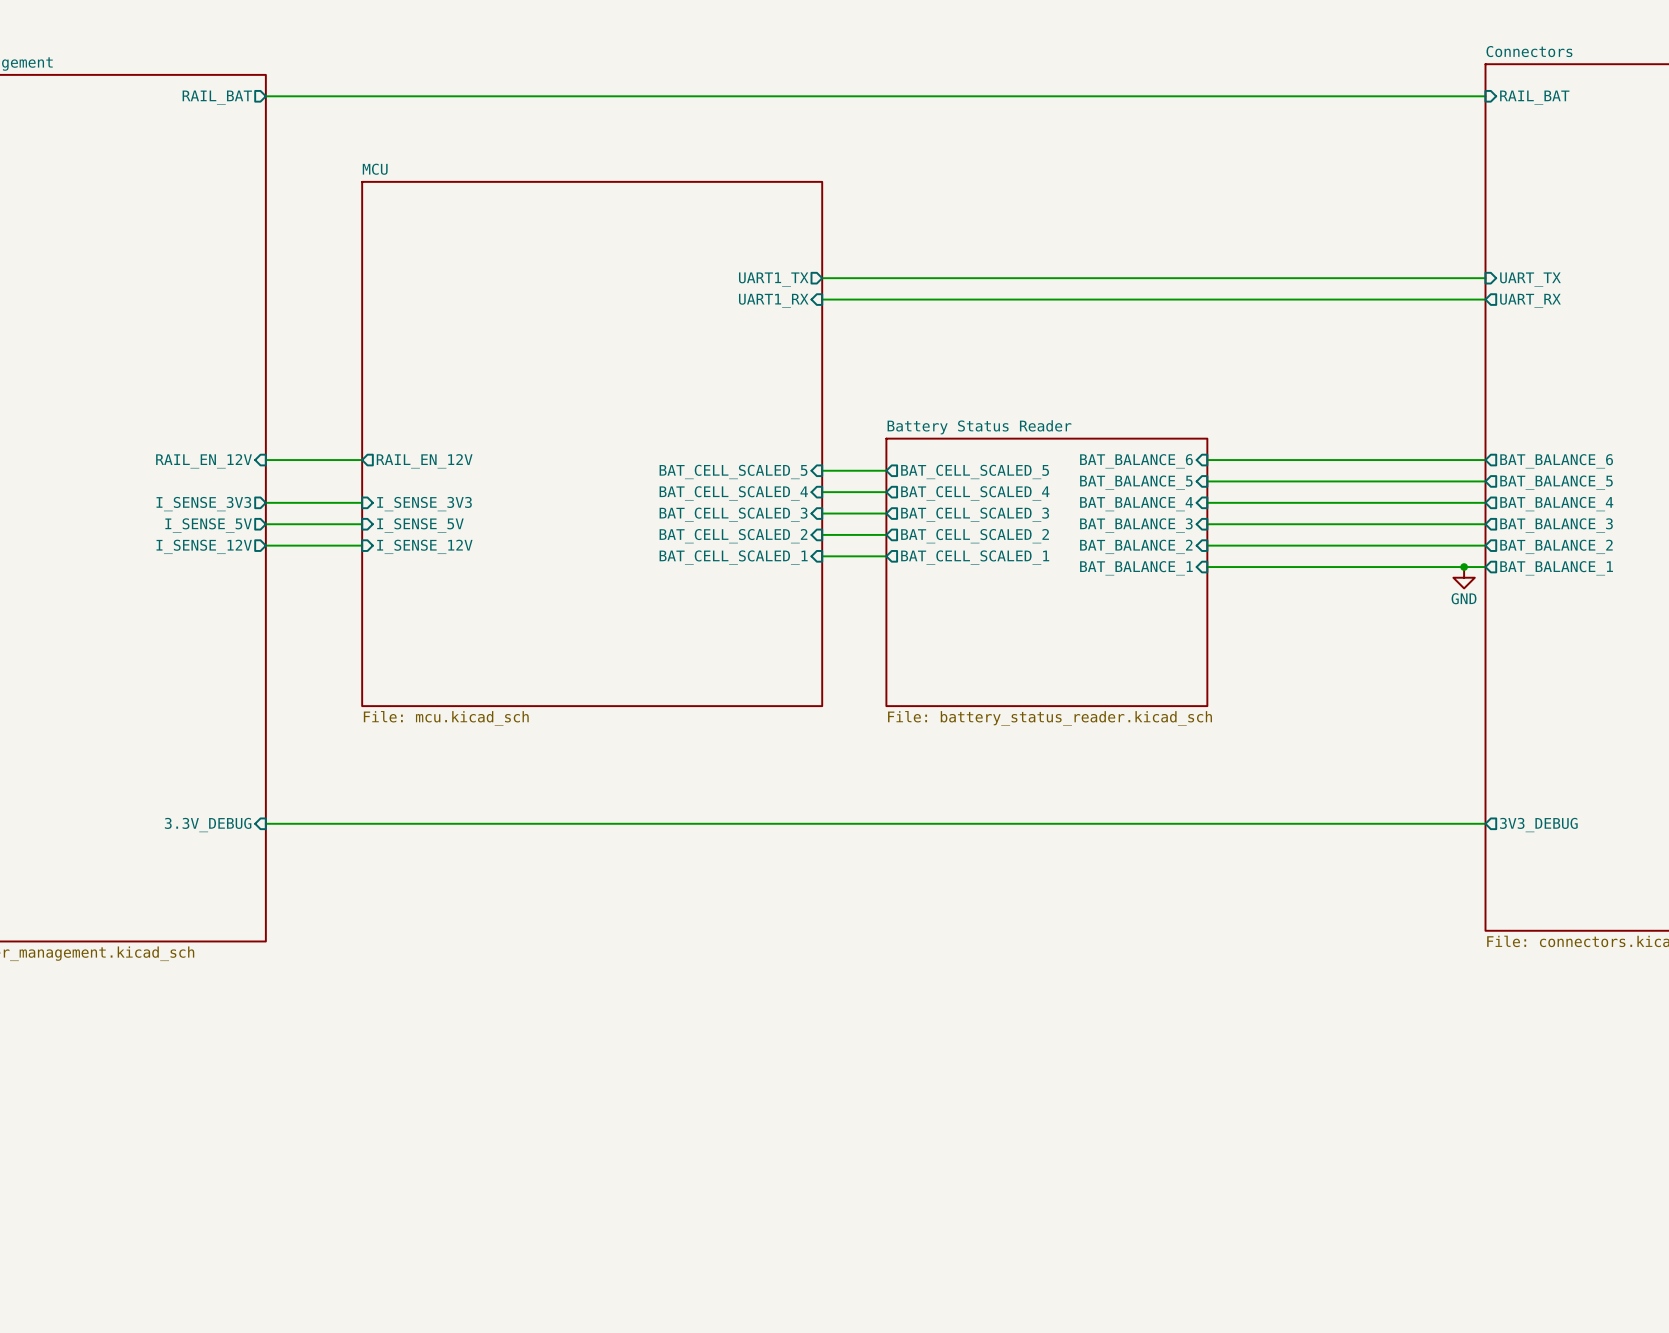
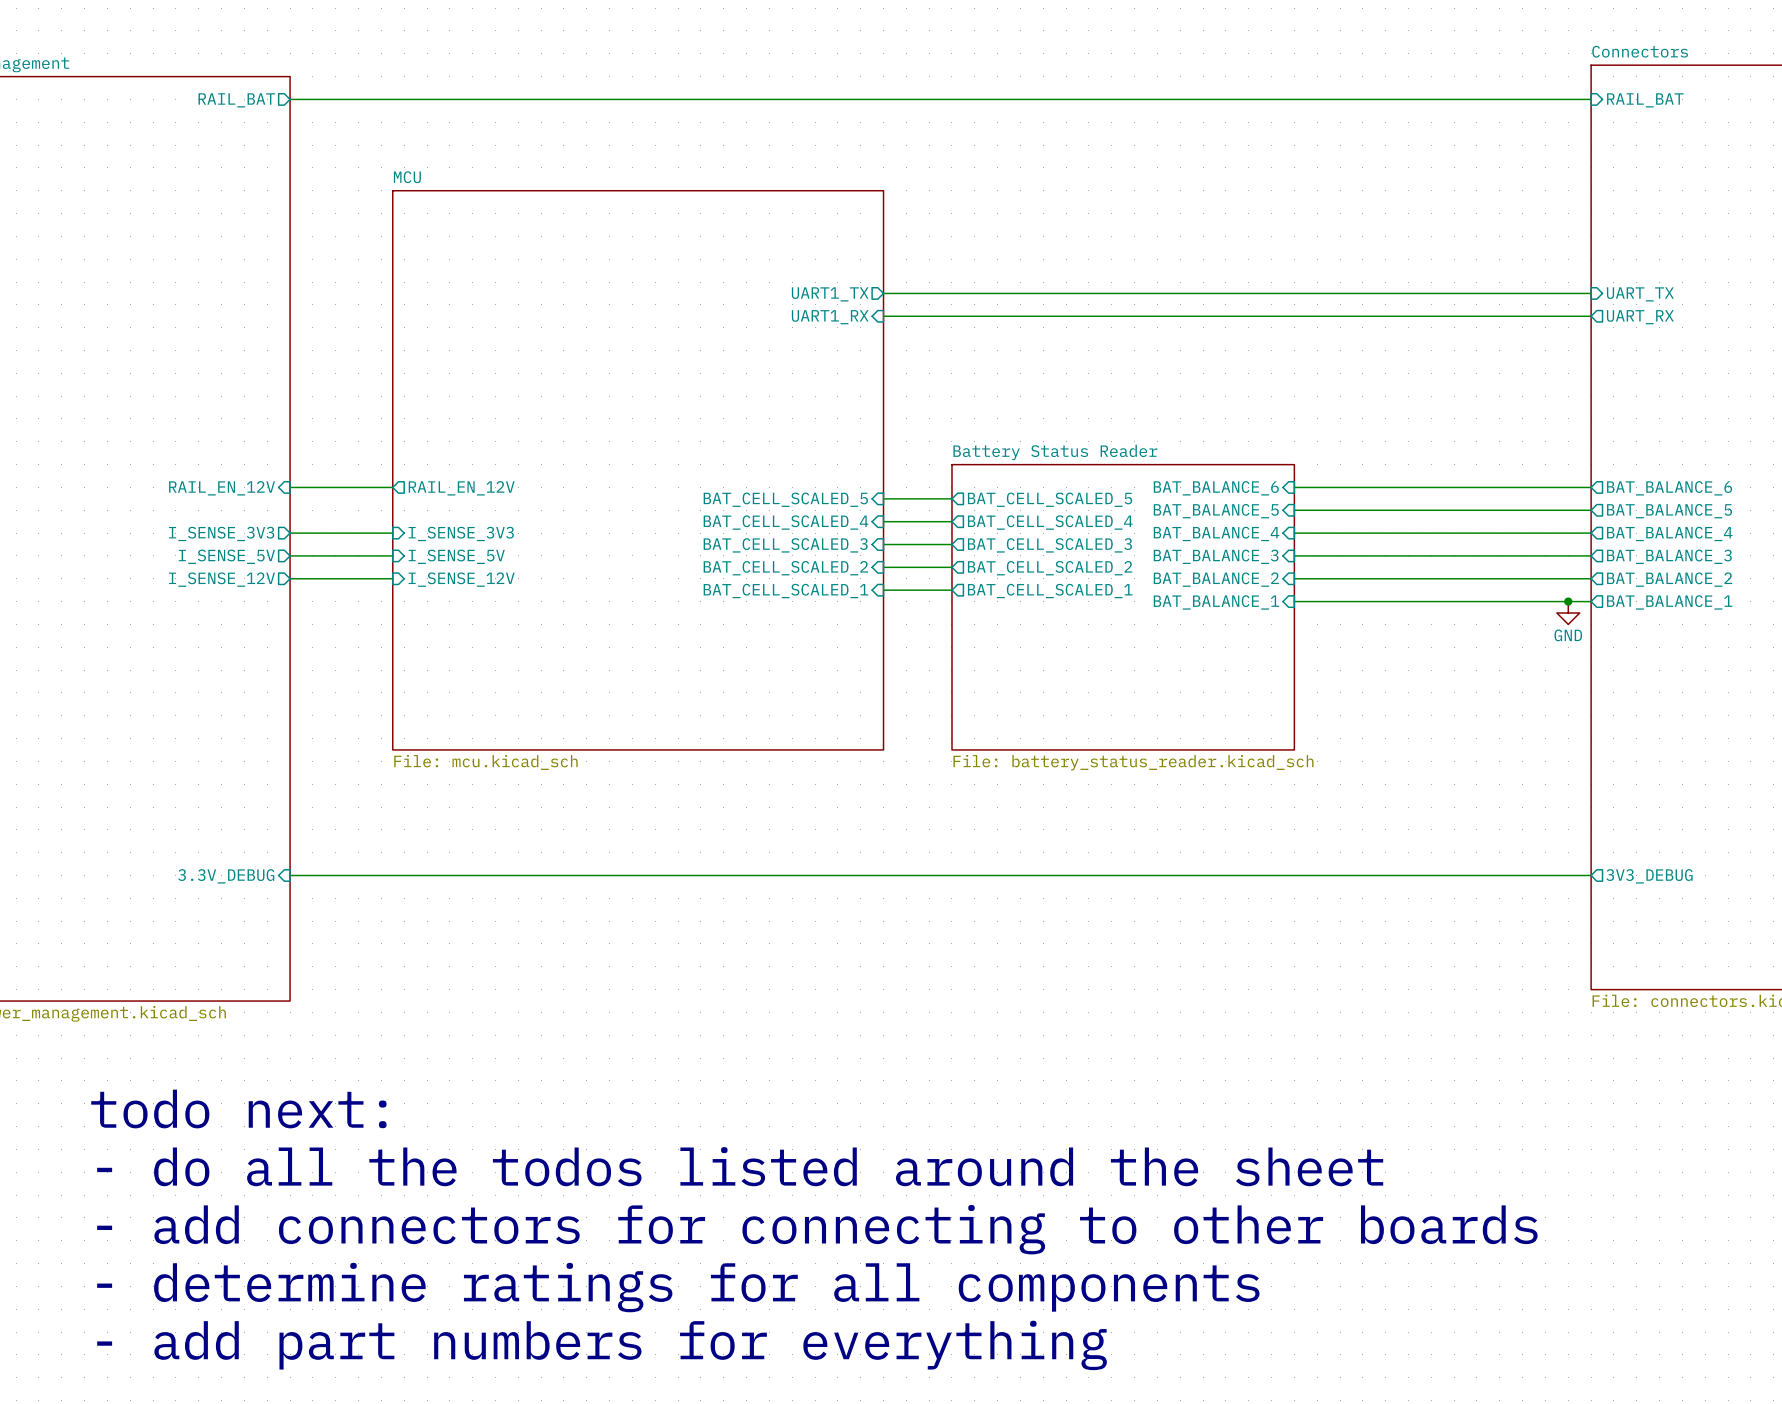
text: none -> todo next: (238, 1109)
text: none -> - do all the todos listed around the sheet (740, 1166)
text: none -> - add connectors for connecting to other boards (817, 1229)
text: none -> - determine ratings for all components (678, 1287)
text: none -> - add part numbers for everything (602, 1345)

